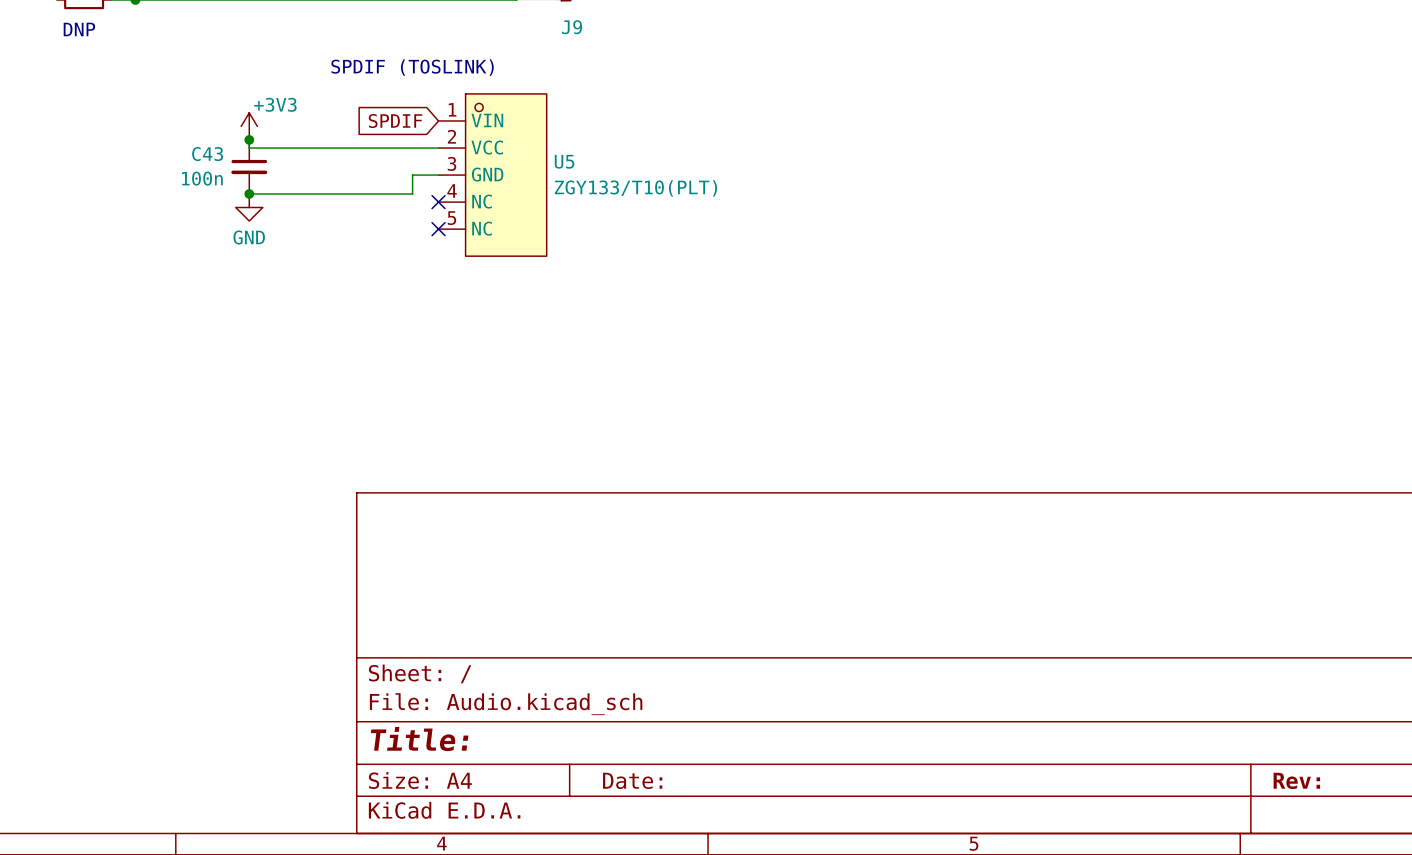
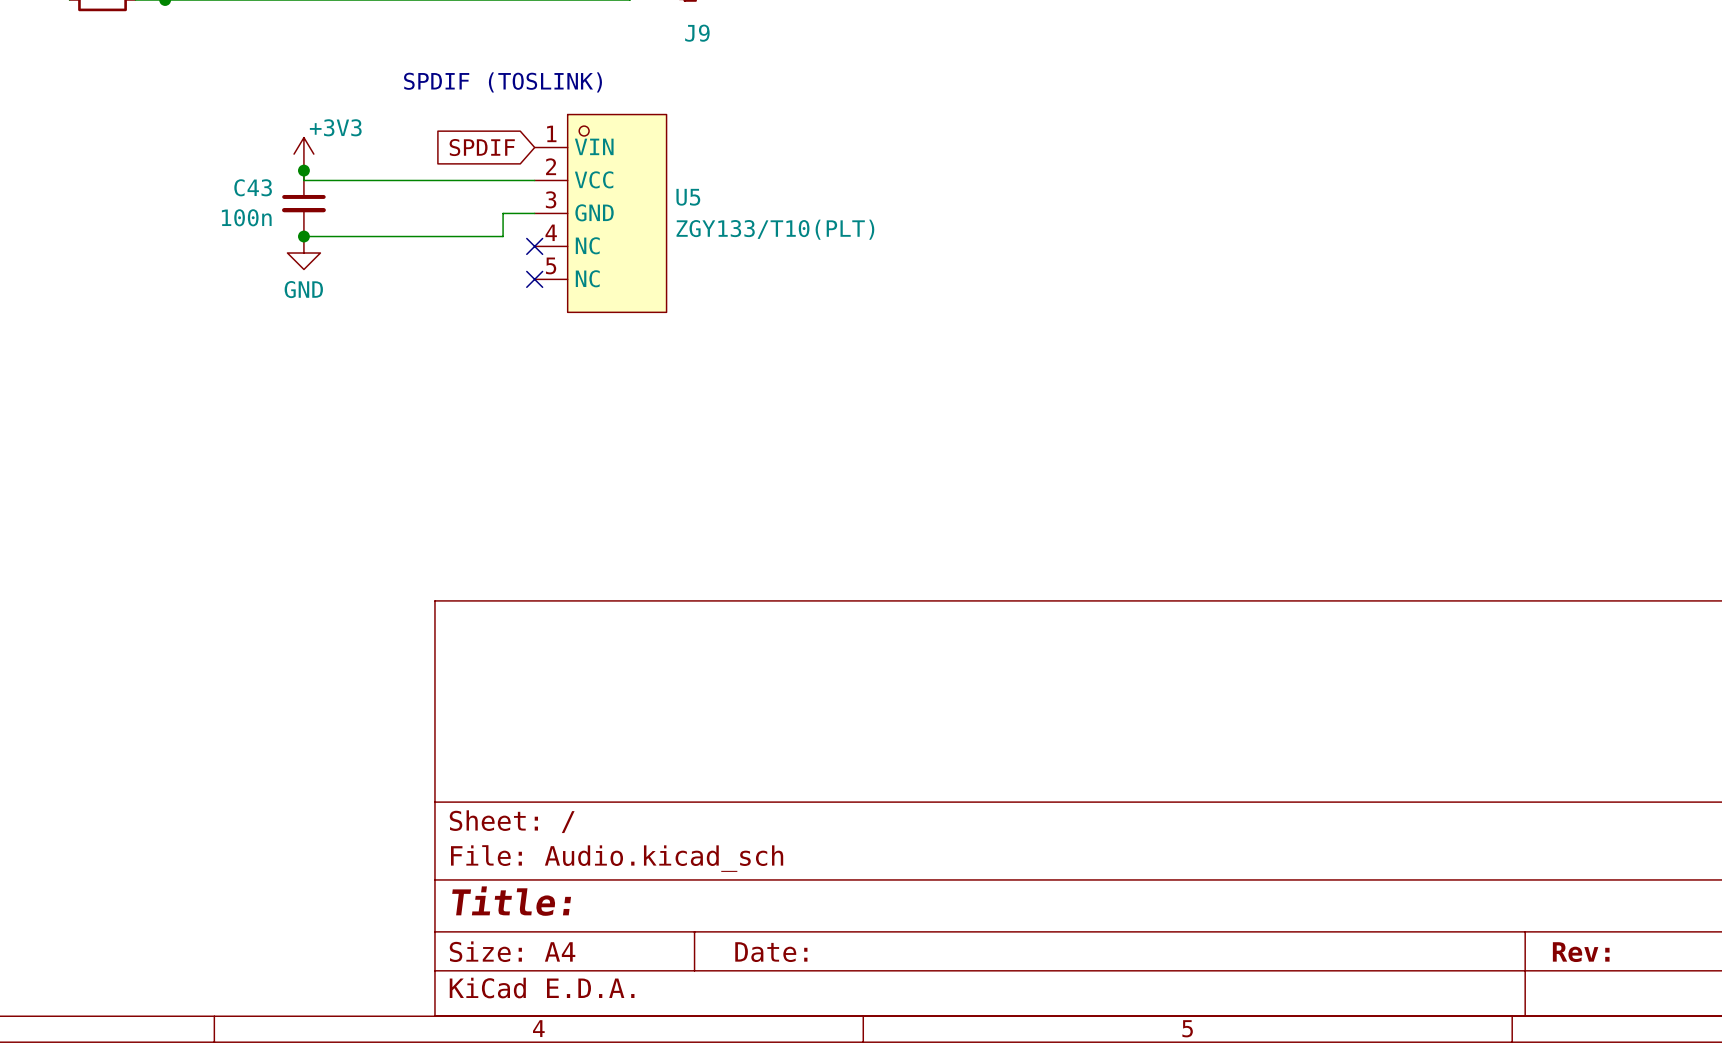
text: DNP (79, 29) -> none

